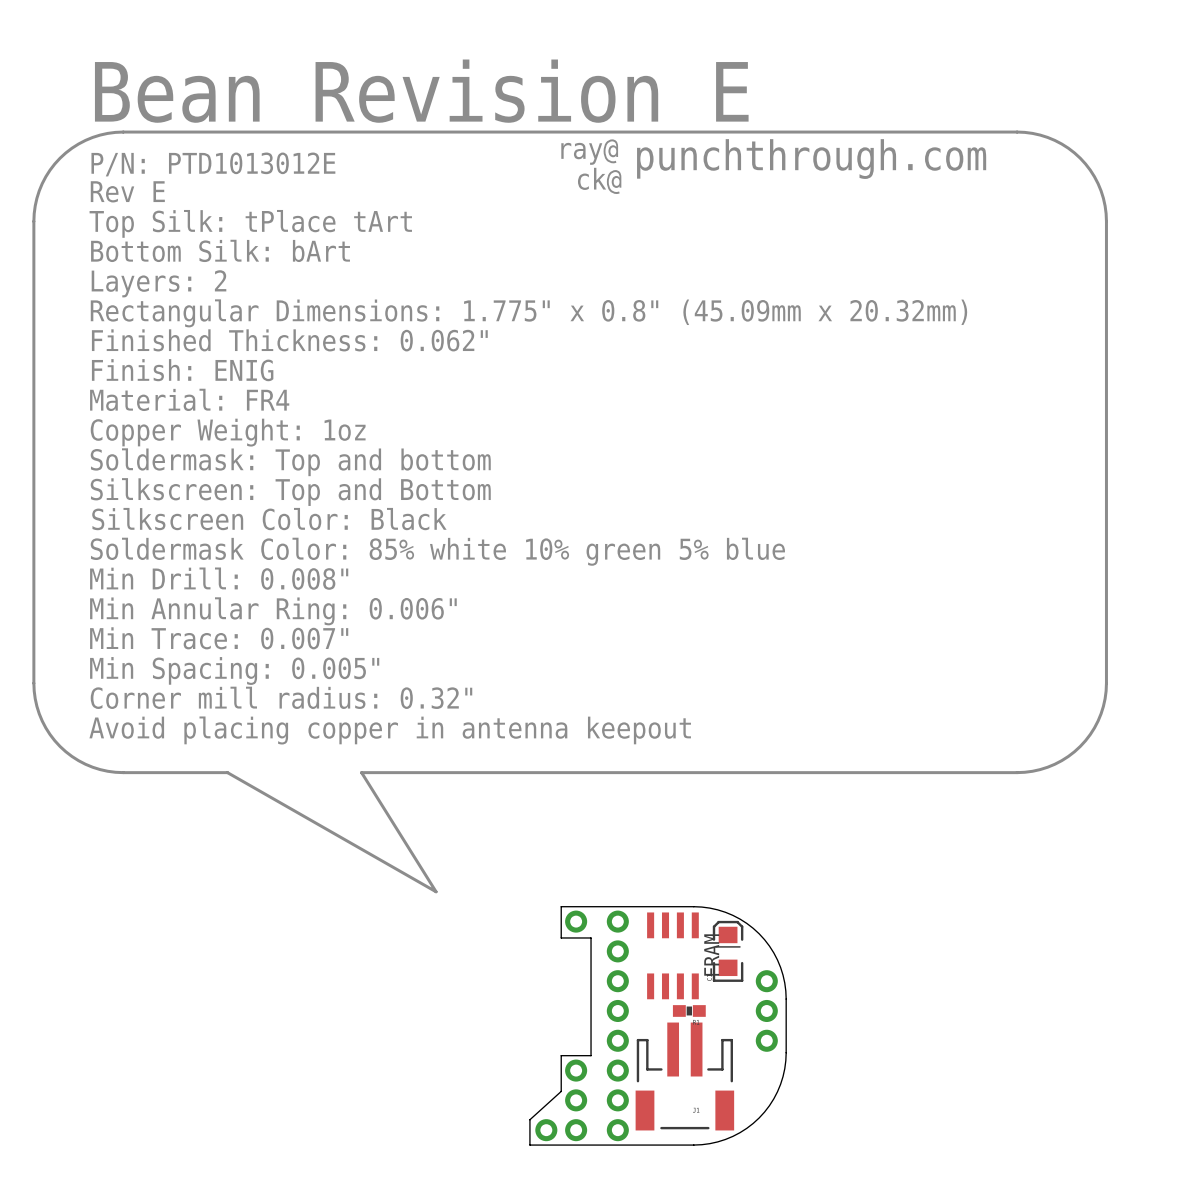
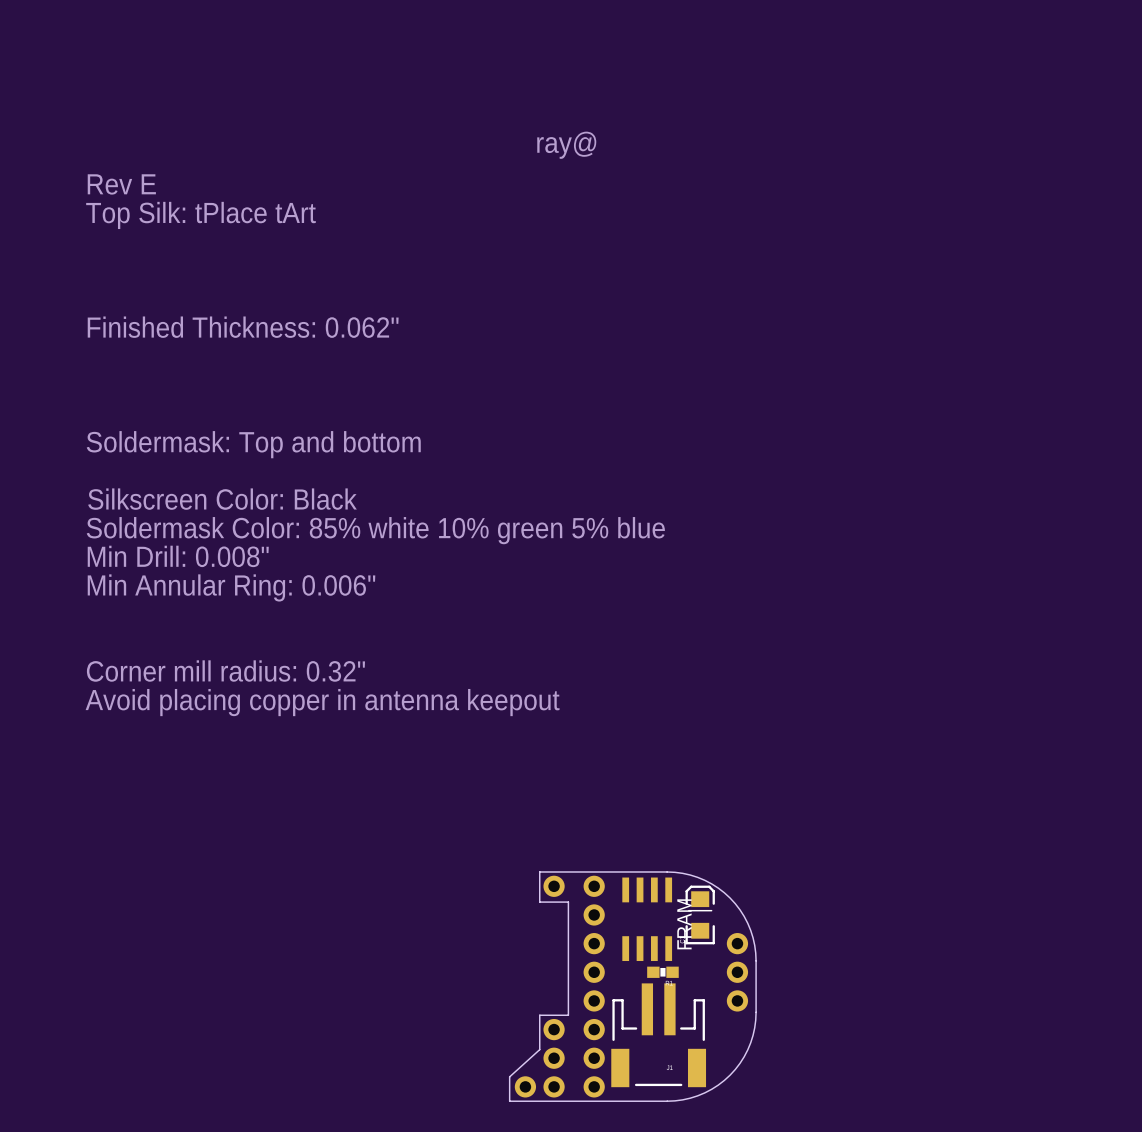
text: Bean Revision E (421, 91) -> none
line: (123, 132) (1017, 132) (1040, 135) (1061, 144) (1080, 158) (1090, 170) (1101, 190) (1106, 213) (1106, 683) (1103, 706) (1094, 727) (1080, 746) (1068, 756) (1047, 767) (1024, 772) (361, 772) (436, 891) (227, 772) (115, 772) (100, 769) (78, 760) (60, 746) (50, 734) (39, 713) (34, 691) (34, 213) (42, 183) (60, 158) (85, 140) (100, 135) (123, 132) -> none
text: punchthrough.com (811, 159) -> none
text: P/N: PTD1013012E (213, 164) -> none
text: ck@ (599, 180) -> none
text: Bottom Silk: bArt (220, 250) -> none
text: Layers: 2 (158, 283) -> none
text: Rectangular Dimensions: 1.775" x 0.8" (45.09mm x 20.32mm) (528, 313) -> none
text: Finish: ENIG (182, 370) -> none
text: Material: FR4 (189, 399) -> none
text: Copper Weight: 1oz (228, 432) -> none
text: Silkscreen: Top and Bottom (290, 492) -> none
text: Min Trace: 0.007" (219, 638) -> none
text: Min Spacing: 0.005" (234, 670) -> none

